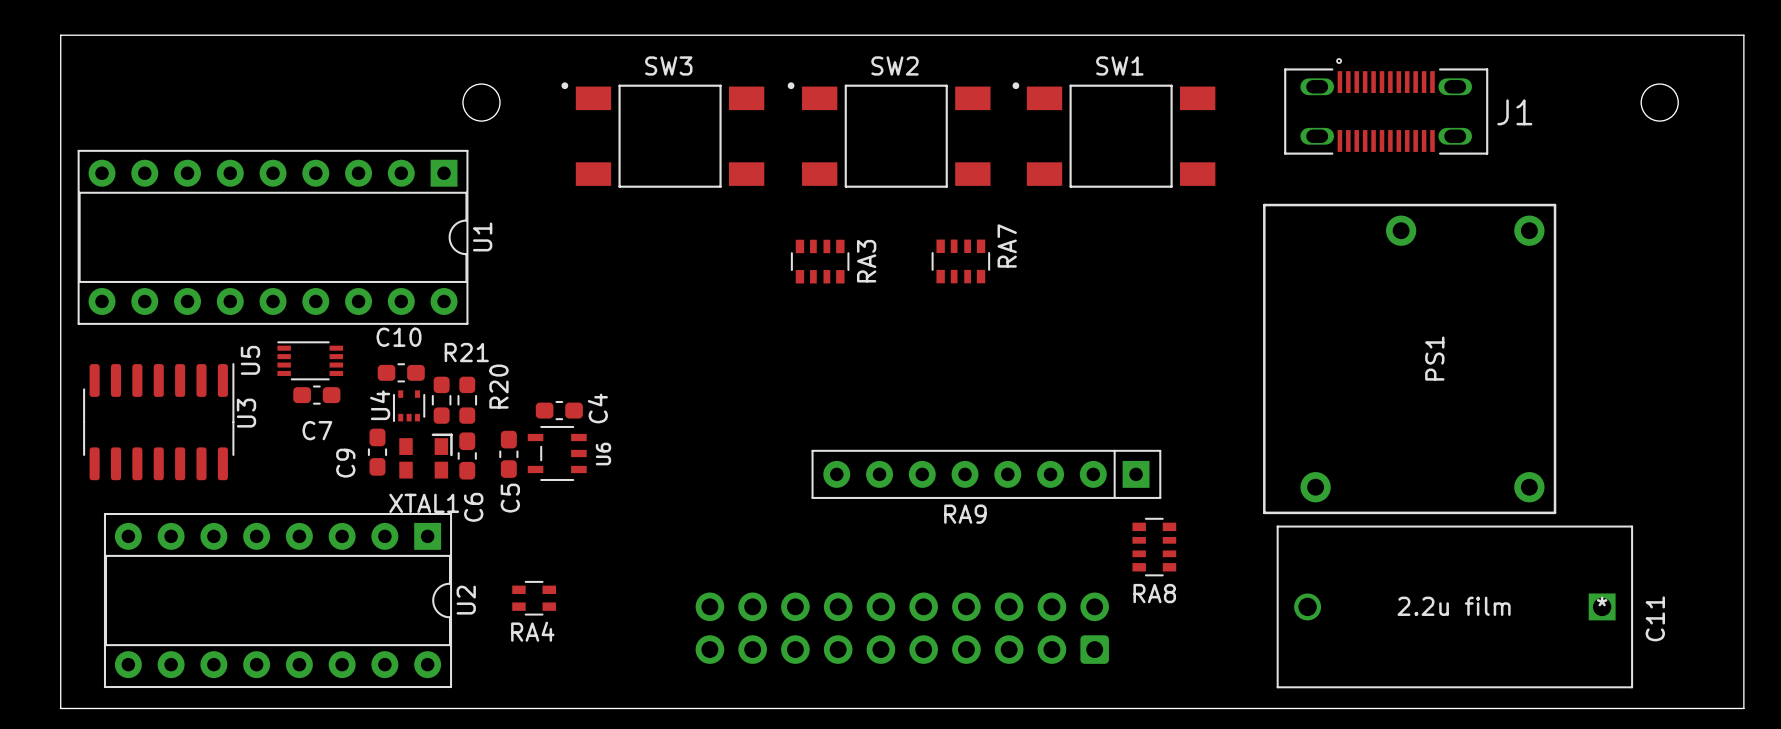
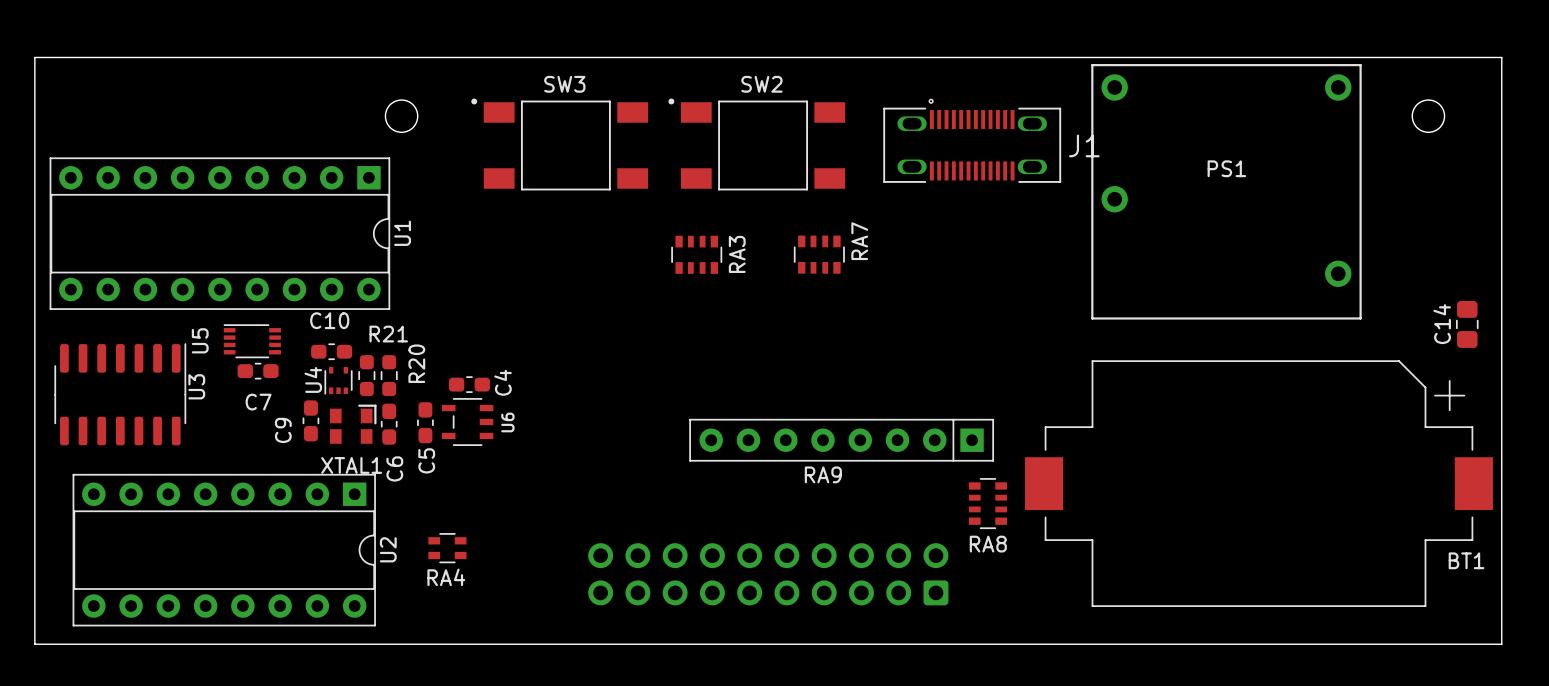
J1 position: (1386, 106) -> (972, 140)
SW1: (1113, 135) -> none
C14: none -> (1467, 324)
PS1 rotation: 0° (1409, 358) -> 90° counterclockwise (1226, 191)
BT1: none -> (1258, 483)
C11: 2.2u film (1454, 606) -> none

